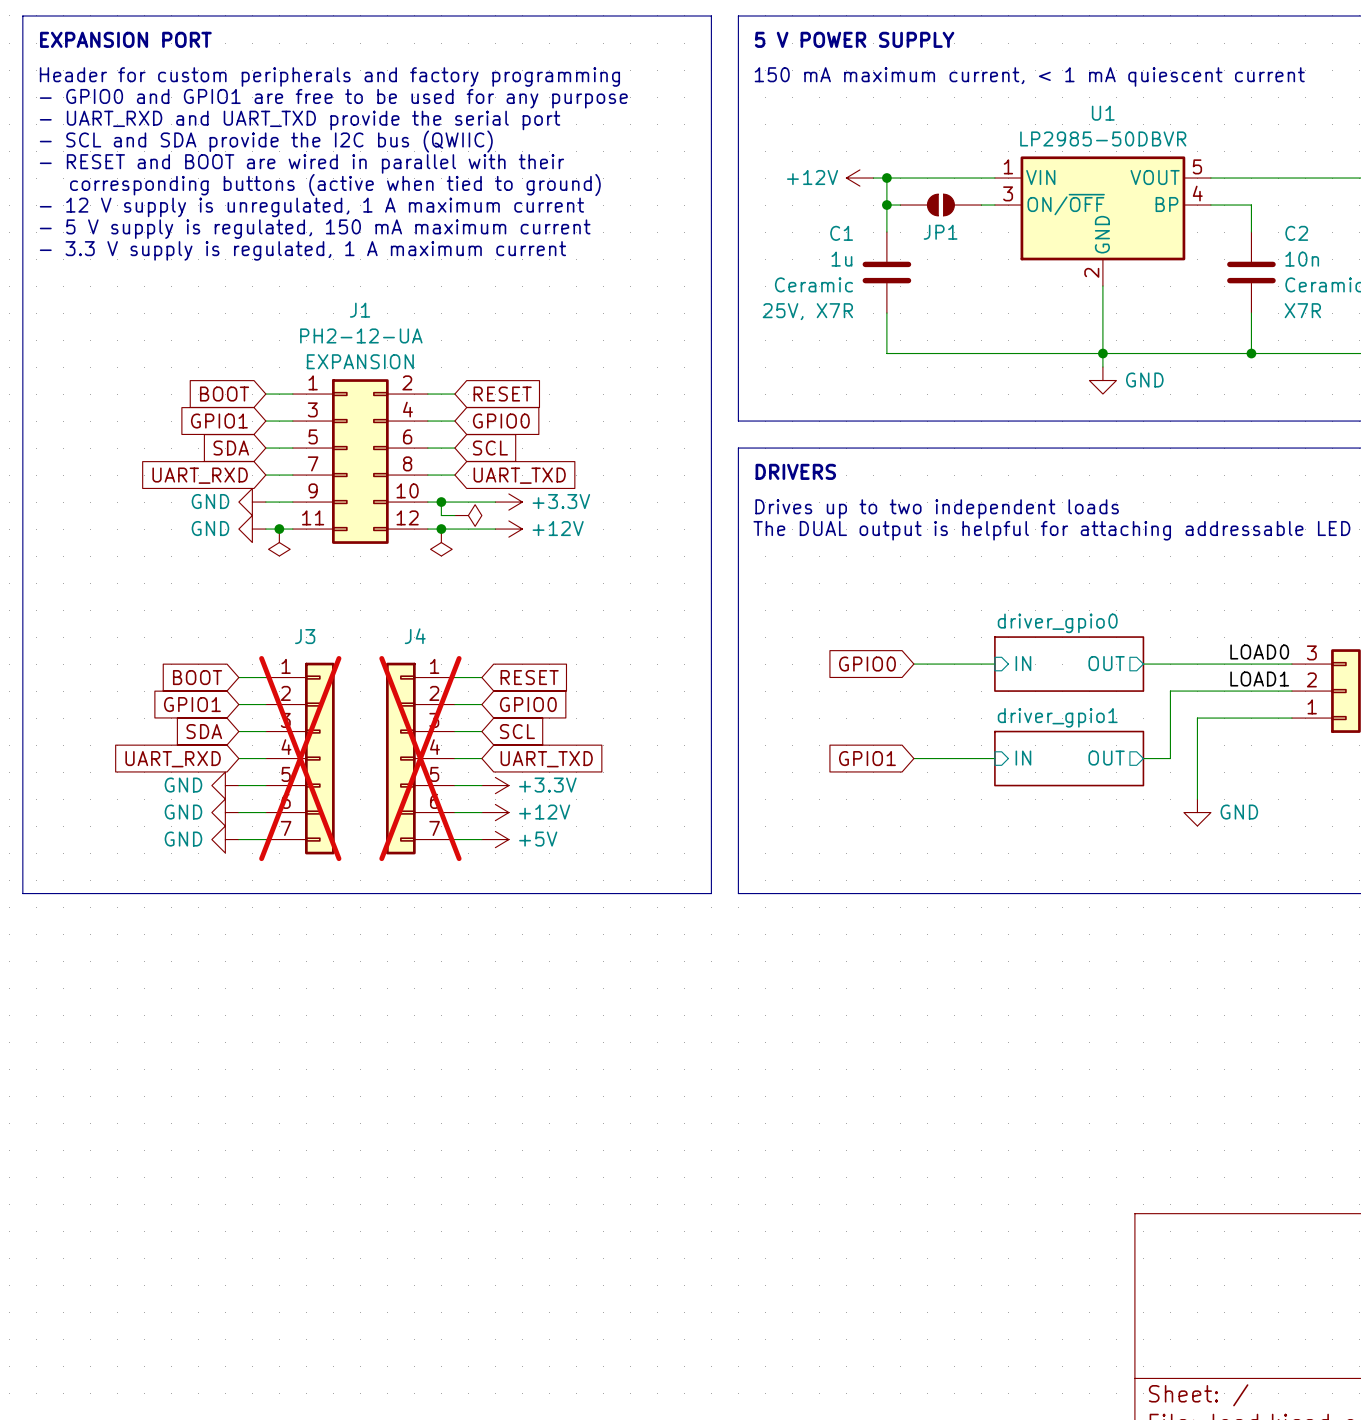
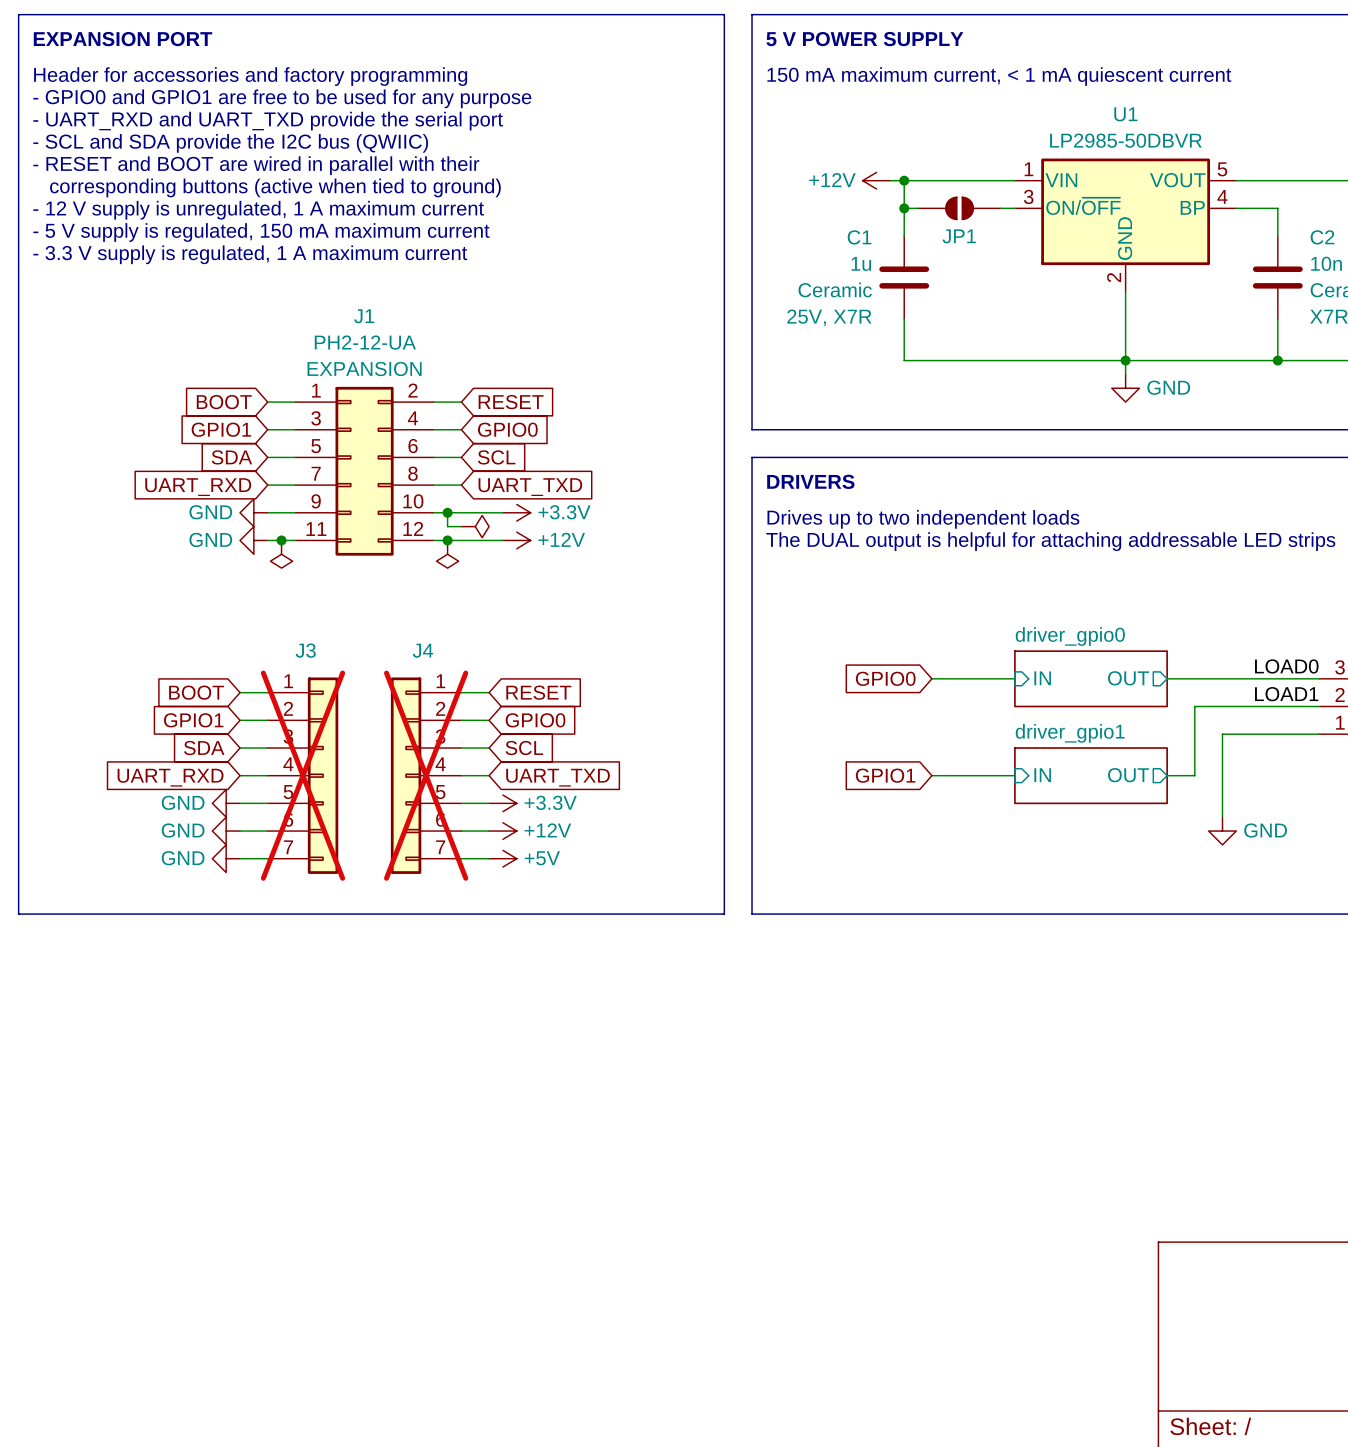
text: Header for custom peripherals and factory programming (329, 76) -> Header for accessories and factory programming (250, 76)

